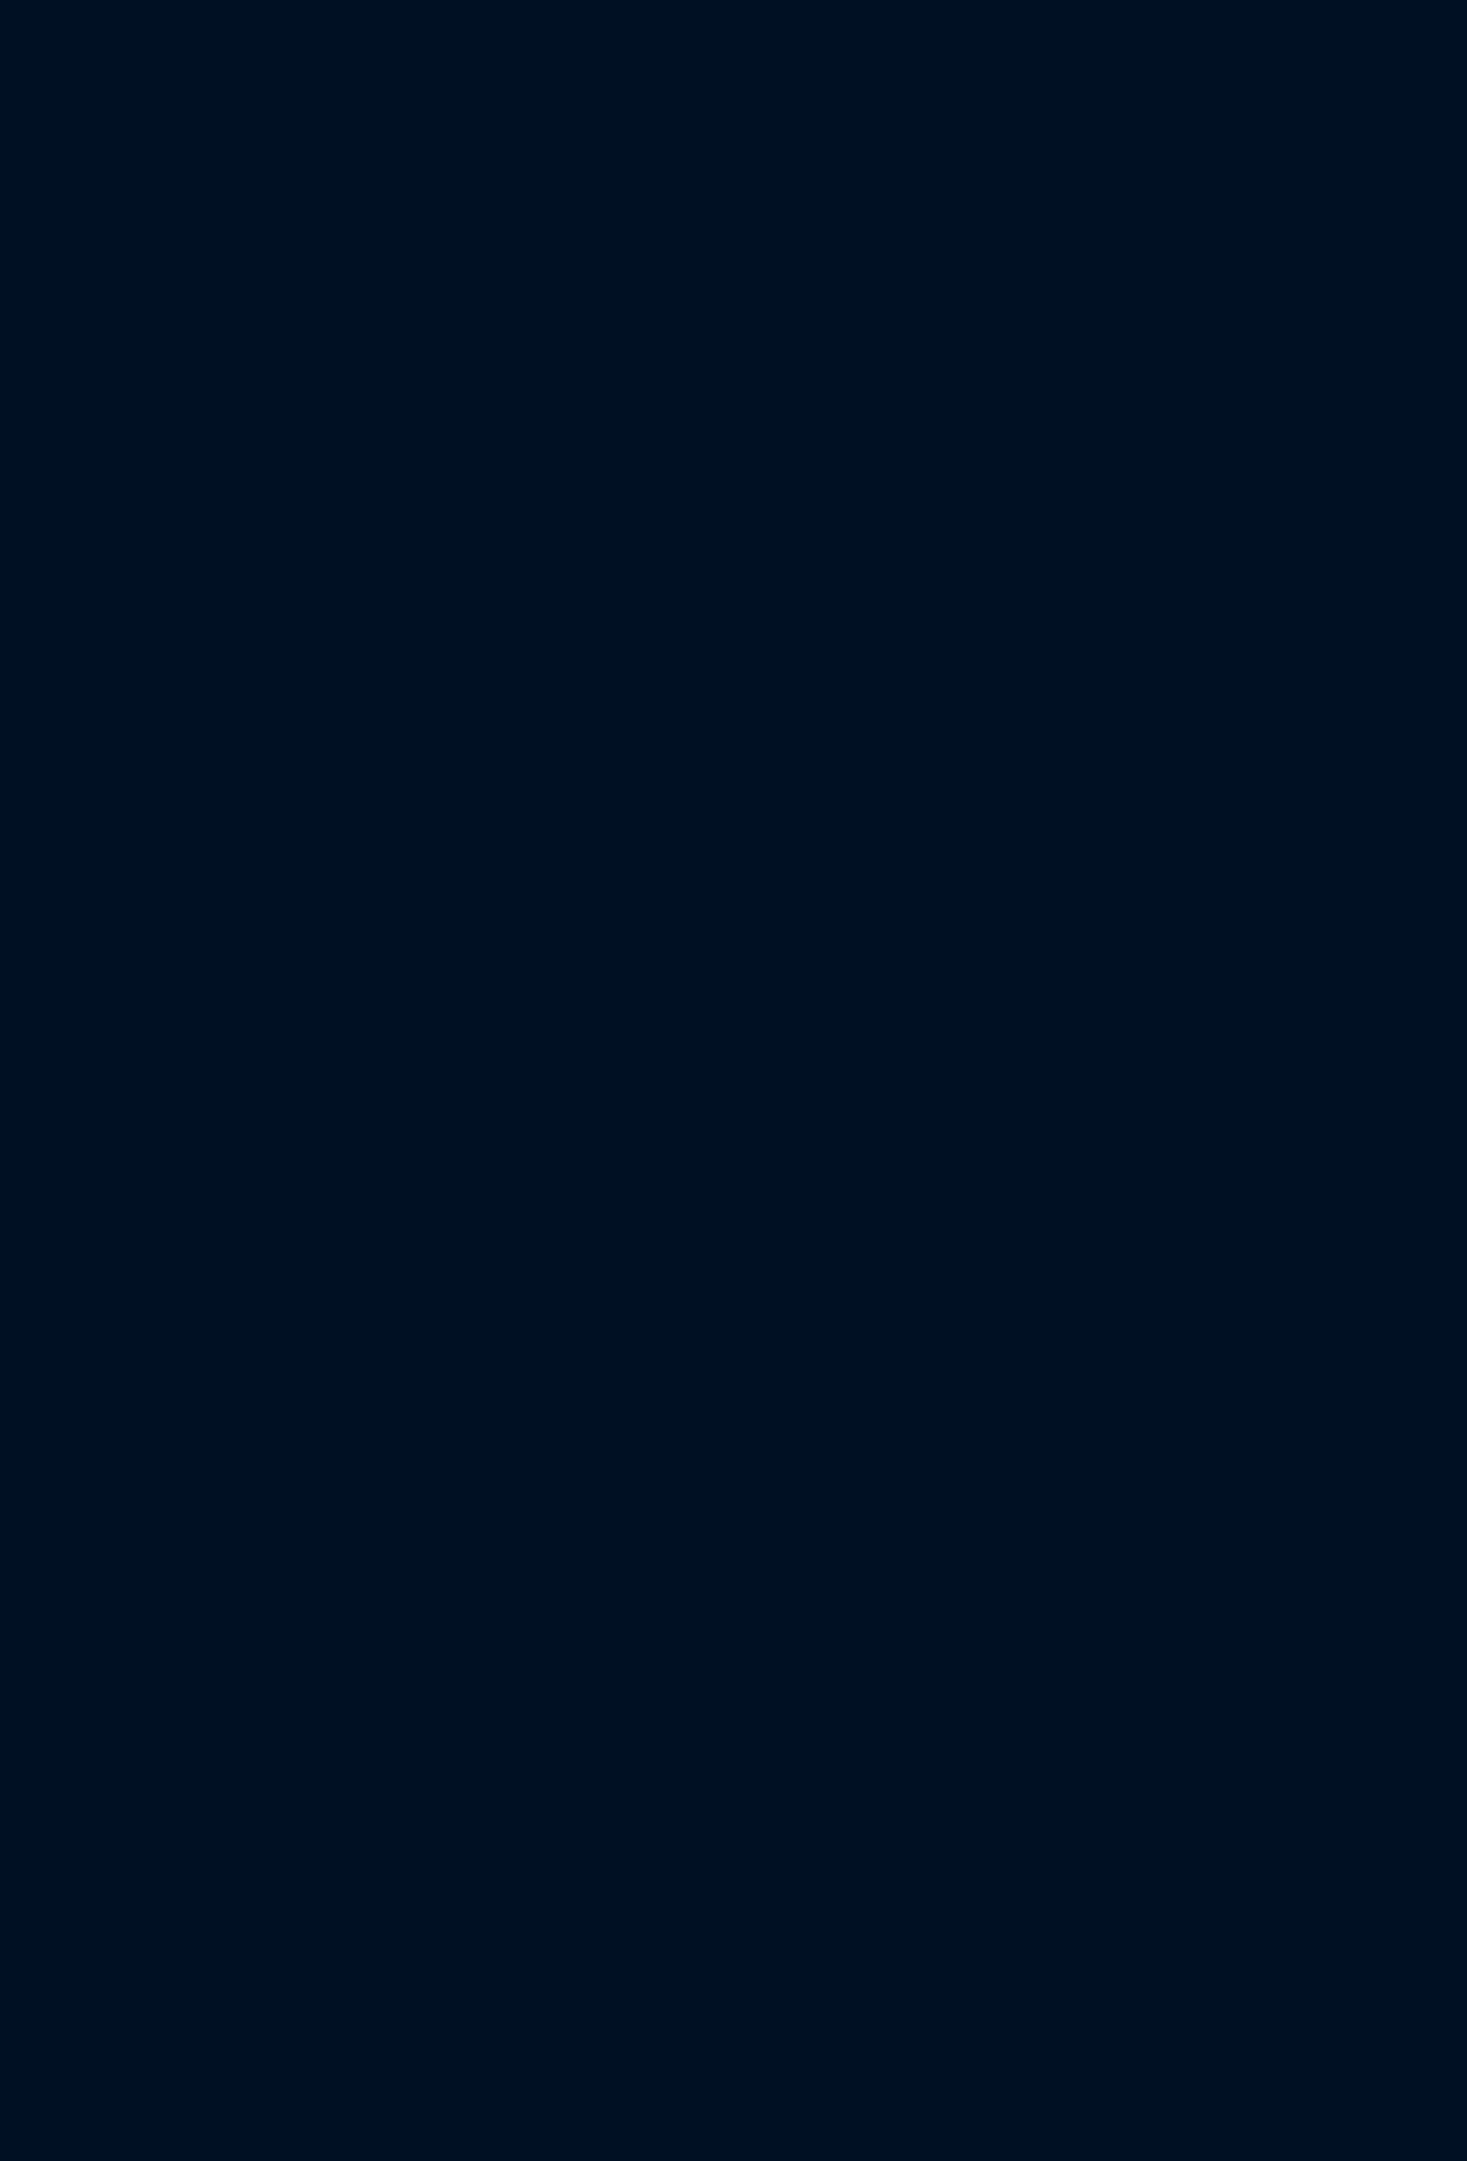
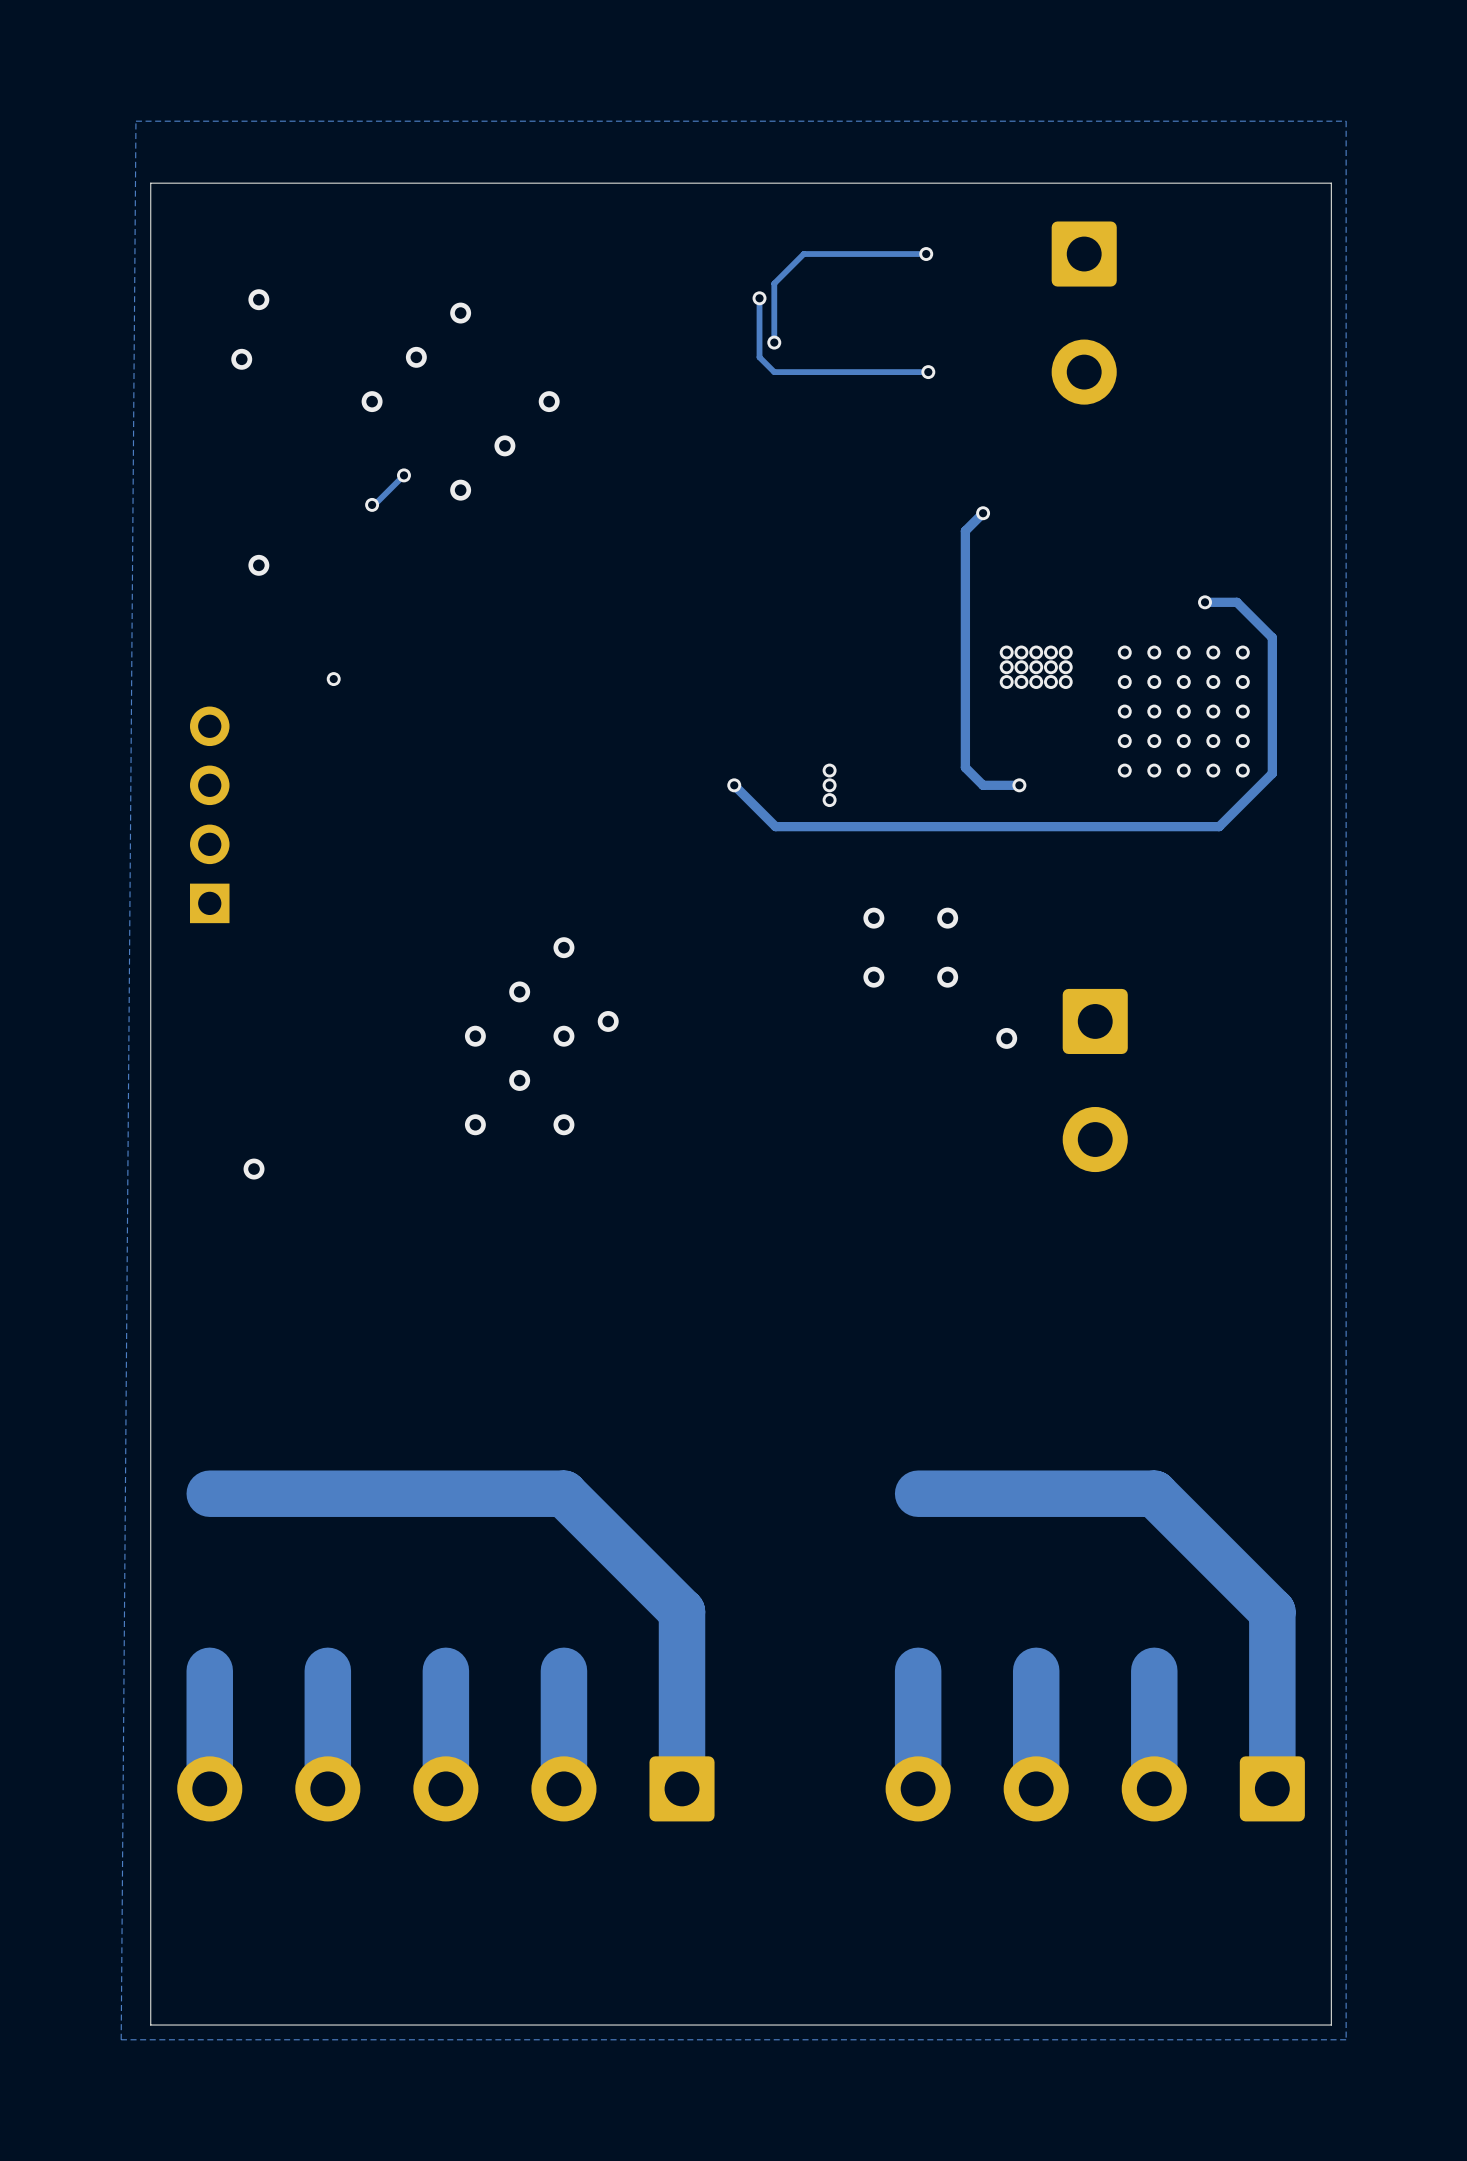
zone outline: none -> (1346, 121) (135, 121) (121, 2039) (1346, 2039) (1346, 121)
board edge: none -> (1331, 183) (150, 183) (150, 2025) (1331, 2025) (1331, 183)
track: none -> (926, 254) (803, 254) (774, 283) (774, 342)
via: none -> (926, 254)
track: none -> (759, 298) (759, 357) (774, 372) (928, 372)
via: none -> (759, 298)
via: none -> (258, 299)
via: none -> (460, 313)
part: none -> (1084, 313)
via: none -> (774, 342)
via: none -> (416, 357)
via: none -> (241, 359)
via: none -> (928, 372)
via: none -> (372, 401)
via: none -> (549, 401)
via: none -> (504, 445)
track: none -> (403, 475) (374, 504) (372, 504)
via: none -> (403, 475)
via: none -> (460, 490)
via: none -> (372, 504)
track: none -> (983, 513) (965, 530) (965, 767) (983, 785) (1019, 785)
via: none -> (983, 513)
via: none -> (258, 565)
track: none -> (1205, 602) (1236, 602) (1272, 637) (1272, 773) (1219, 826) (775, 826) (734, 785)
via: none -> (1205, 602)
via: none -> (1006, 652)
via: none -> (1021, 652)
via: none -> (1036, 652)
via: none -> (1050, 652)
via: none -> (1065, 652)
via: none -> (1124, 652)
via: none -> (1154, 652)
via: none -> (1183, 652)
via: none -> (1213, 652)
via: none -> (1242, 652)
via: none -> (1006, 667)
via: none -> (1021, 667)
via: none -> (1036, 667)
via: none -> (1050, 667)
via: none -> (1065, 667)
via: none -> (333, 679)
via: none -> (1006, 682)
via: none -> (1021, 682)
via: none -> (1036, 682)
via: none -> (1050, 682)
via: none -> (1065, 682)
via: none -> (1124, 682)
via: none -> (1154, 682)
via: none -> (1183, 682)
via: none -> (1213, 682)
via: none -> (1242, 682)
via: none -> (1124, 711)
via: none -> (1154, 711)
via: none -> (1183, 711)
via: none -> (1213, 711)
via: none -> (1242, 711)
via: none -> (1124, 741)
via: none -> (1154, 741)
via: none -> (1183, 741)
via: none -> (1213, 741)
via: none -> (1242, 741)
via: none -> (829, 770)
via: none -> (1124, 770)
via: none -> (1154, 770)
via: none -> (1183, 770)
via: none -> (1213, 770)
via: none -> (1242, 770)
via: none -> (734, 785)
via: none -> (829, 785)
via: none -> (1019, 785)
via: none -> (829, 800)
part: none -> (209, 814)
via: none -> (873, 918)
via: none -> (947, 918)
via: none -> (563, 947)
via: none -> (873, 977)
via: none -> (947, 977)
via: none -> (519, 991)
via: none -> (608, 1021)
via: none -> (475, 1036)
via: none -> (563, 1036)
via: none -> (1006, 1038)
via: none -> (519, 1080)
part: none -> (1095, 1080)
via: none -> (475, 1124)
via: none -> (563, 1124)
via: none -> (254, 1169)
track: none -> (209, 1493) (563, 1493) (682, 1611) (682, 1788)
track: none -> (918, 1493) (1154, 1493) (1272, 1611) (1272, 1788)
track: none -> (209, 1670) (209, 1788)
track: none -> (327, 1670) (327, 1788)
track: none -> (445, 1670) (445, 1788)
track: none -> (563, 1670) (563, 1788)
track: none -> (918, 1670) (918, 1788)
track: none -> (1036, 1670) (1036, 1788)
track: none -> (1154, 1670) (1154, 1788)
part: none -> (445, 1788)
part: none -> (1095, 1788)

